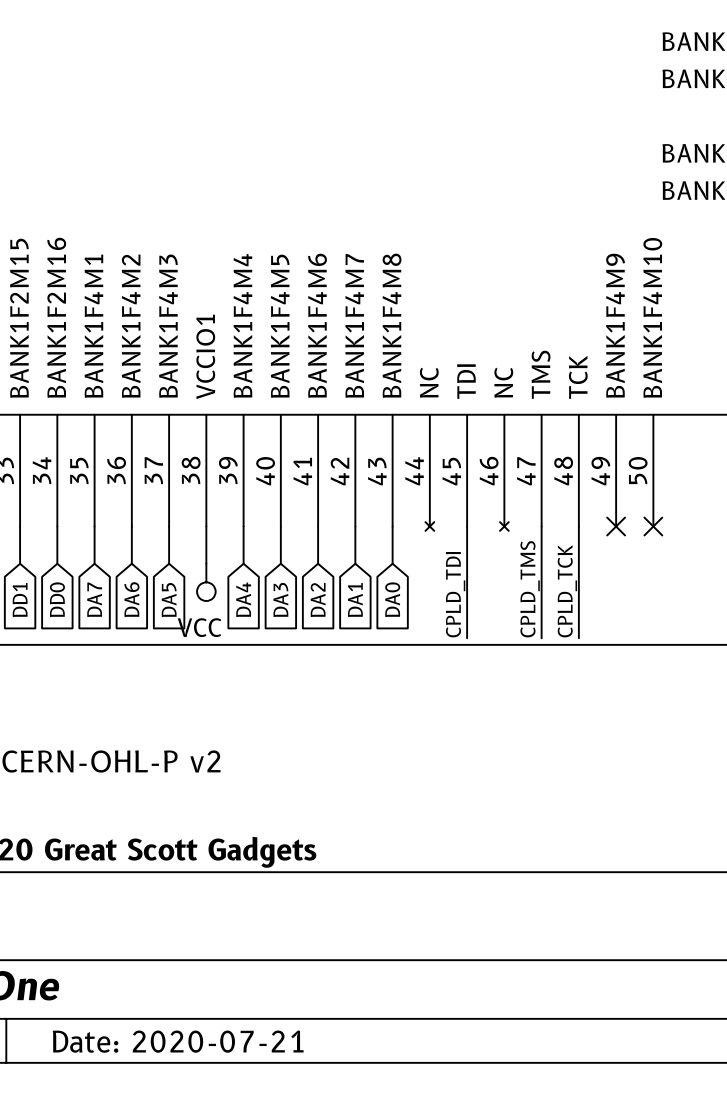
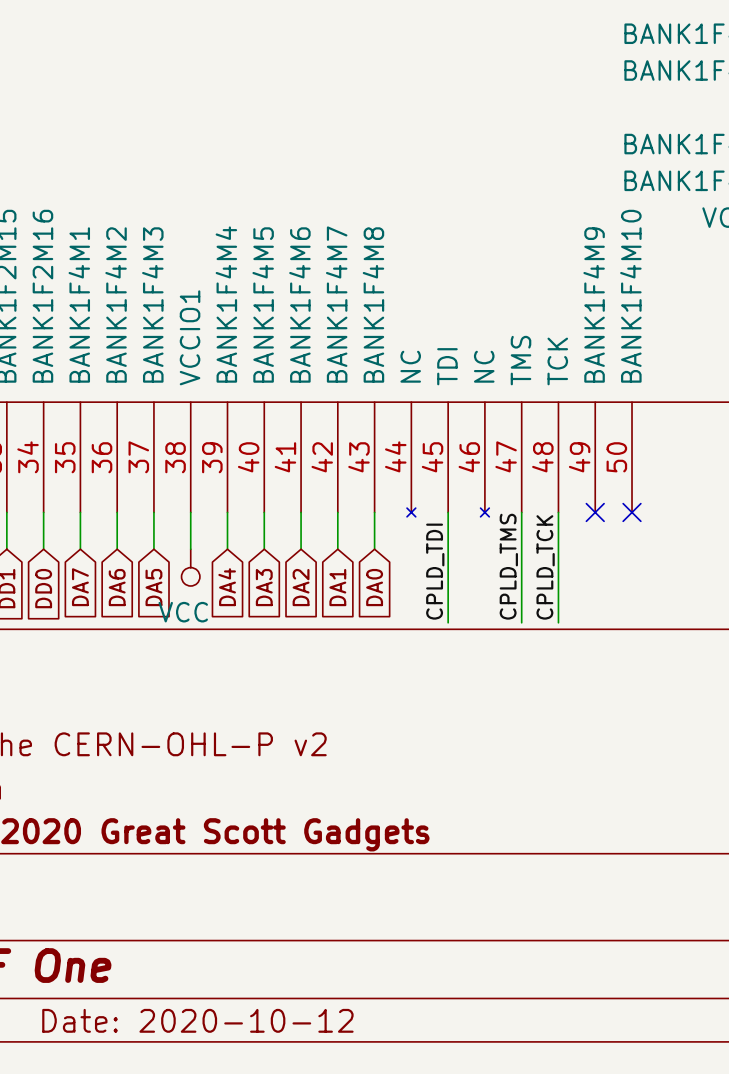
title block: Date: 2020-07-21 (178, 1041) -> Date: 2020-10-12 (197, 1020)

